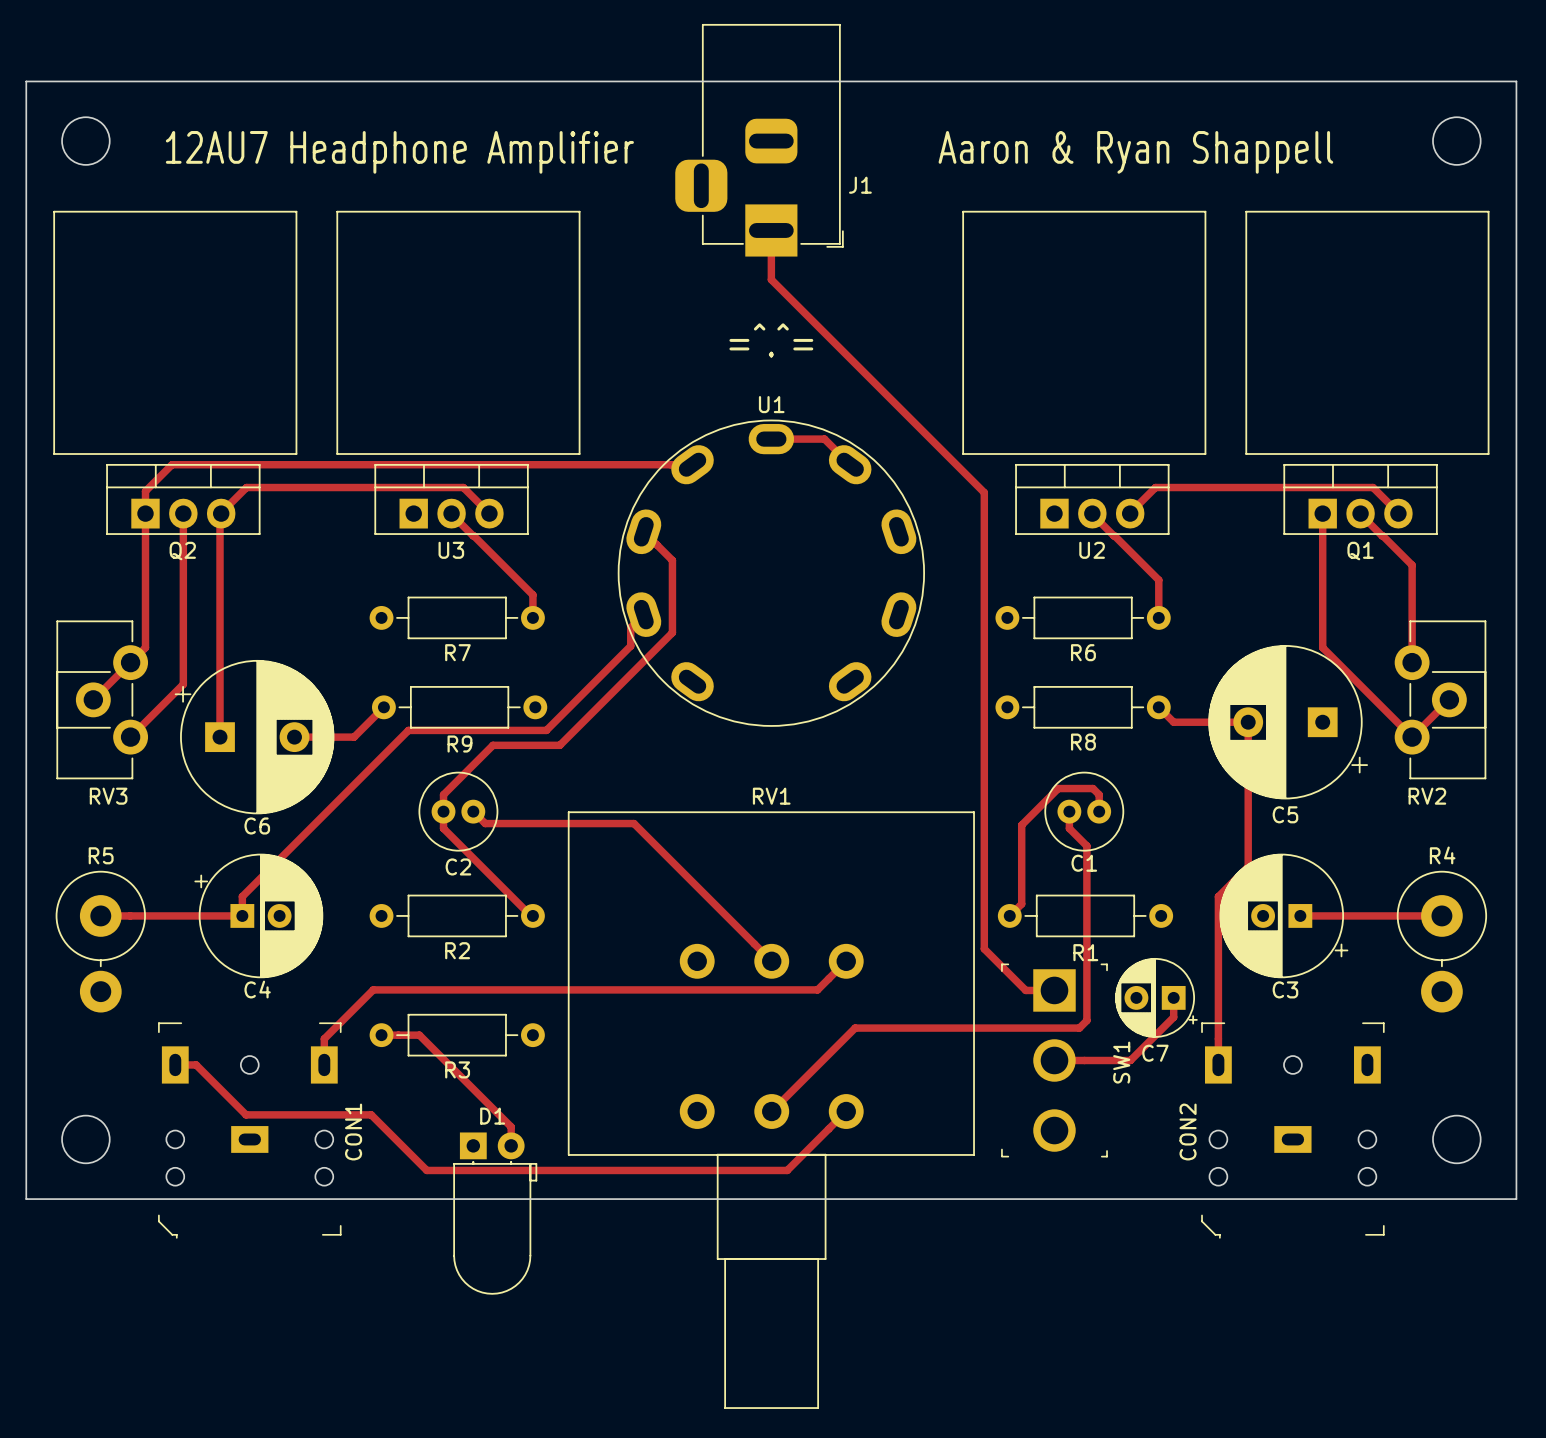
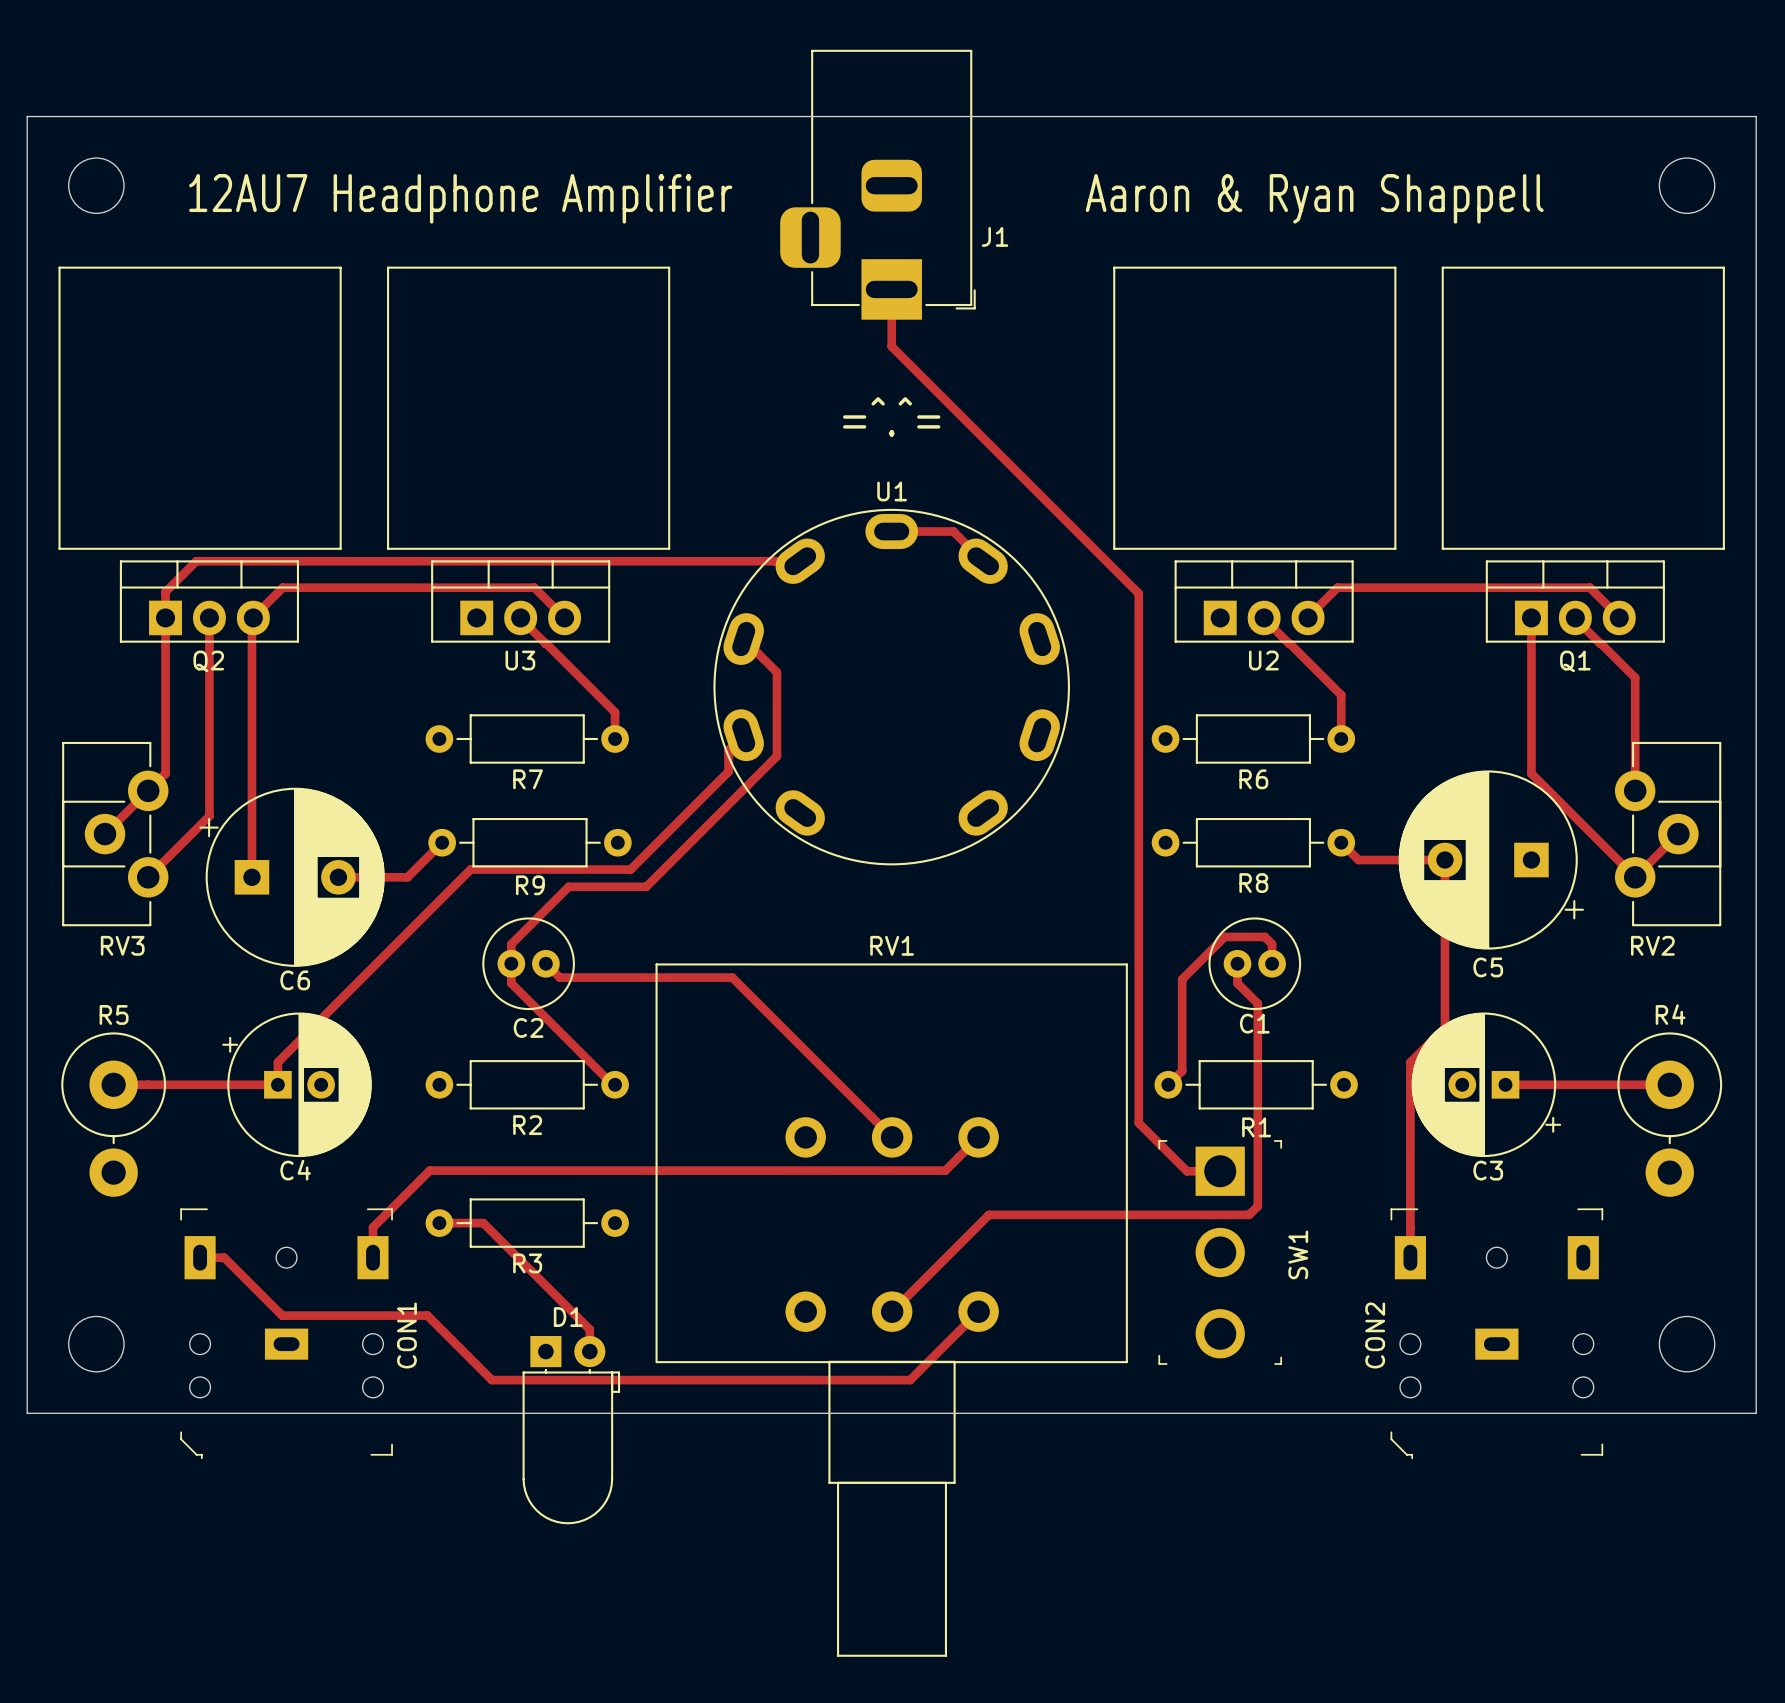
C7: (1156, 997) -> none
track: (1173, 997) (1173, 1017) (1130, 1060) (1054, 1060) -> none

